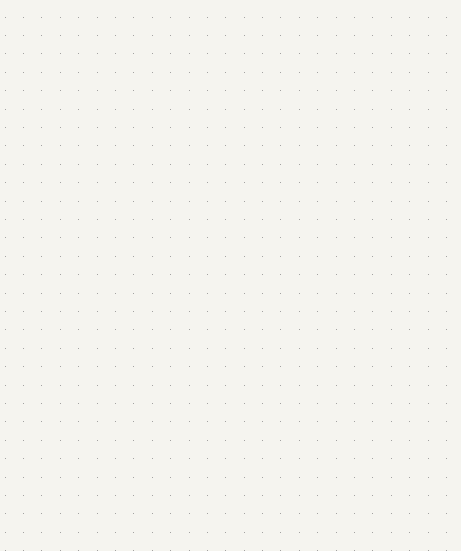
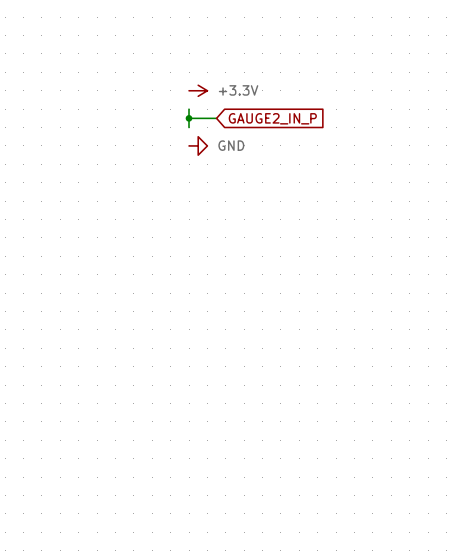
power symbol: none -> +3.3V (198, 90)
wire: none -> (189, 109) (189, 127)
wire: none -> (189, 118) (216, 118)
junction: none -> (189, 118)
global label: none -> GAUGE2_IN_P (272, 118)
power symbol: none -> GND (198, 145)

